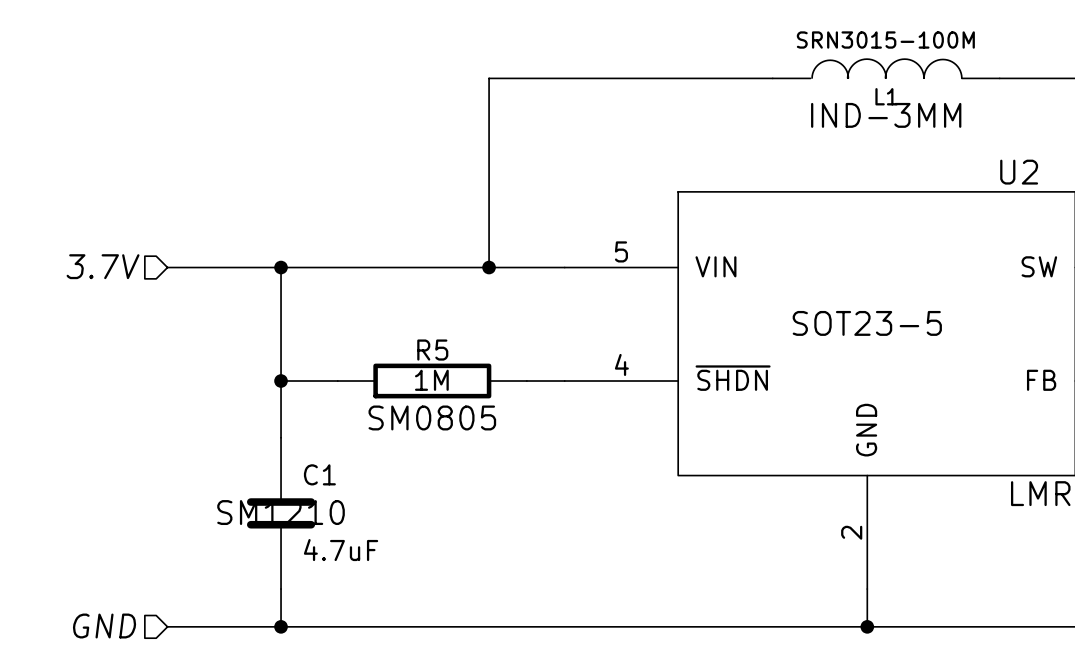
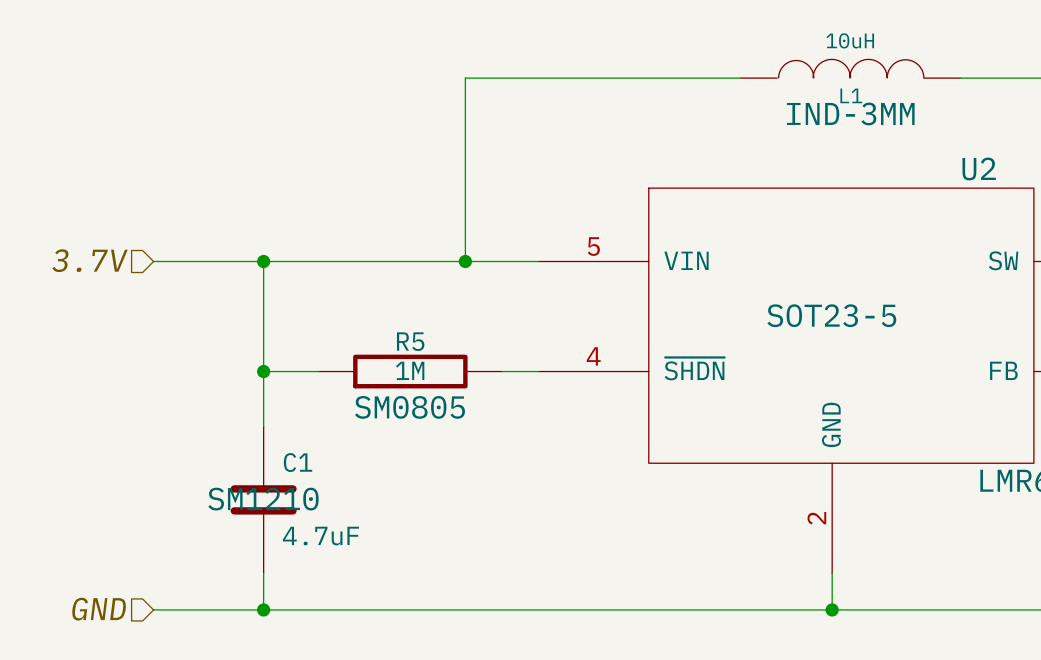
L1 value: SRN3015-100M (885, 40) -> 10uH (850, 40)

